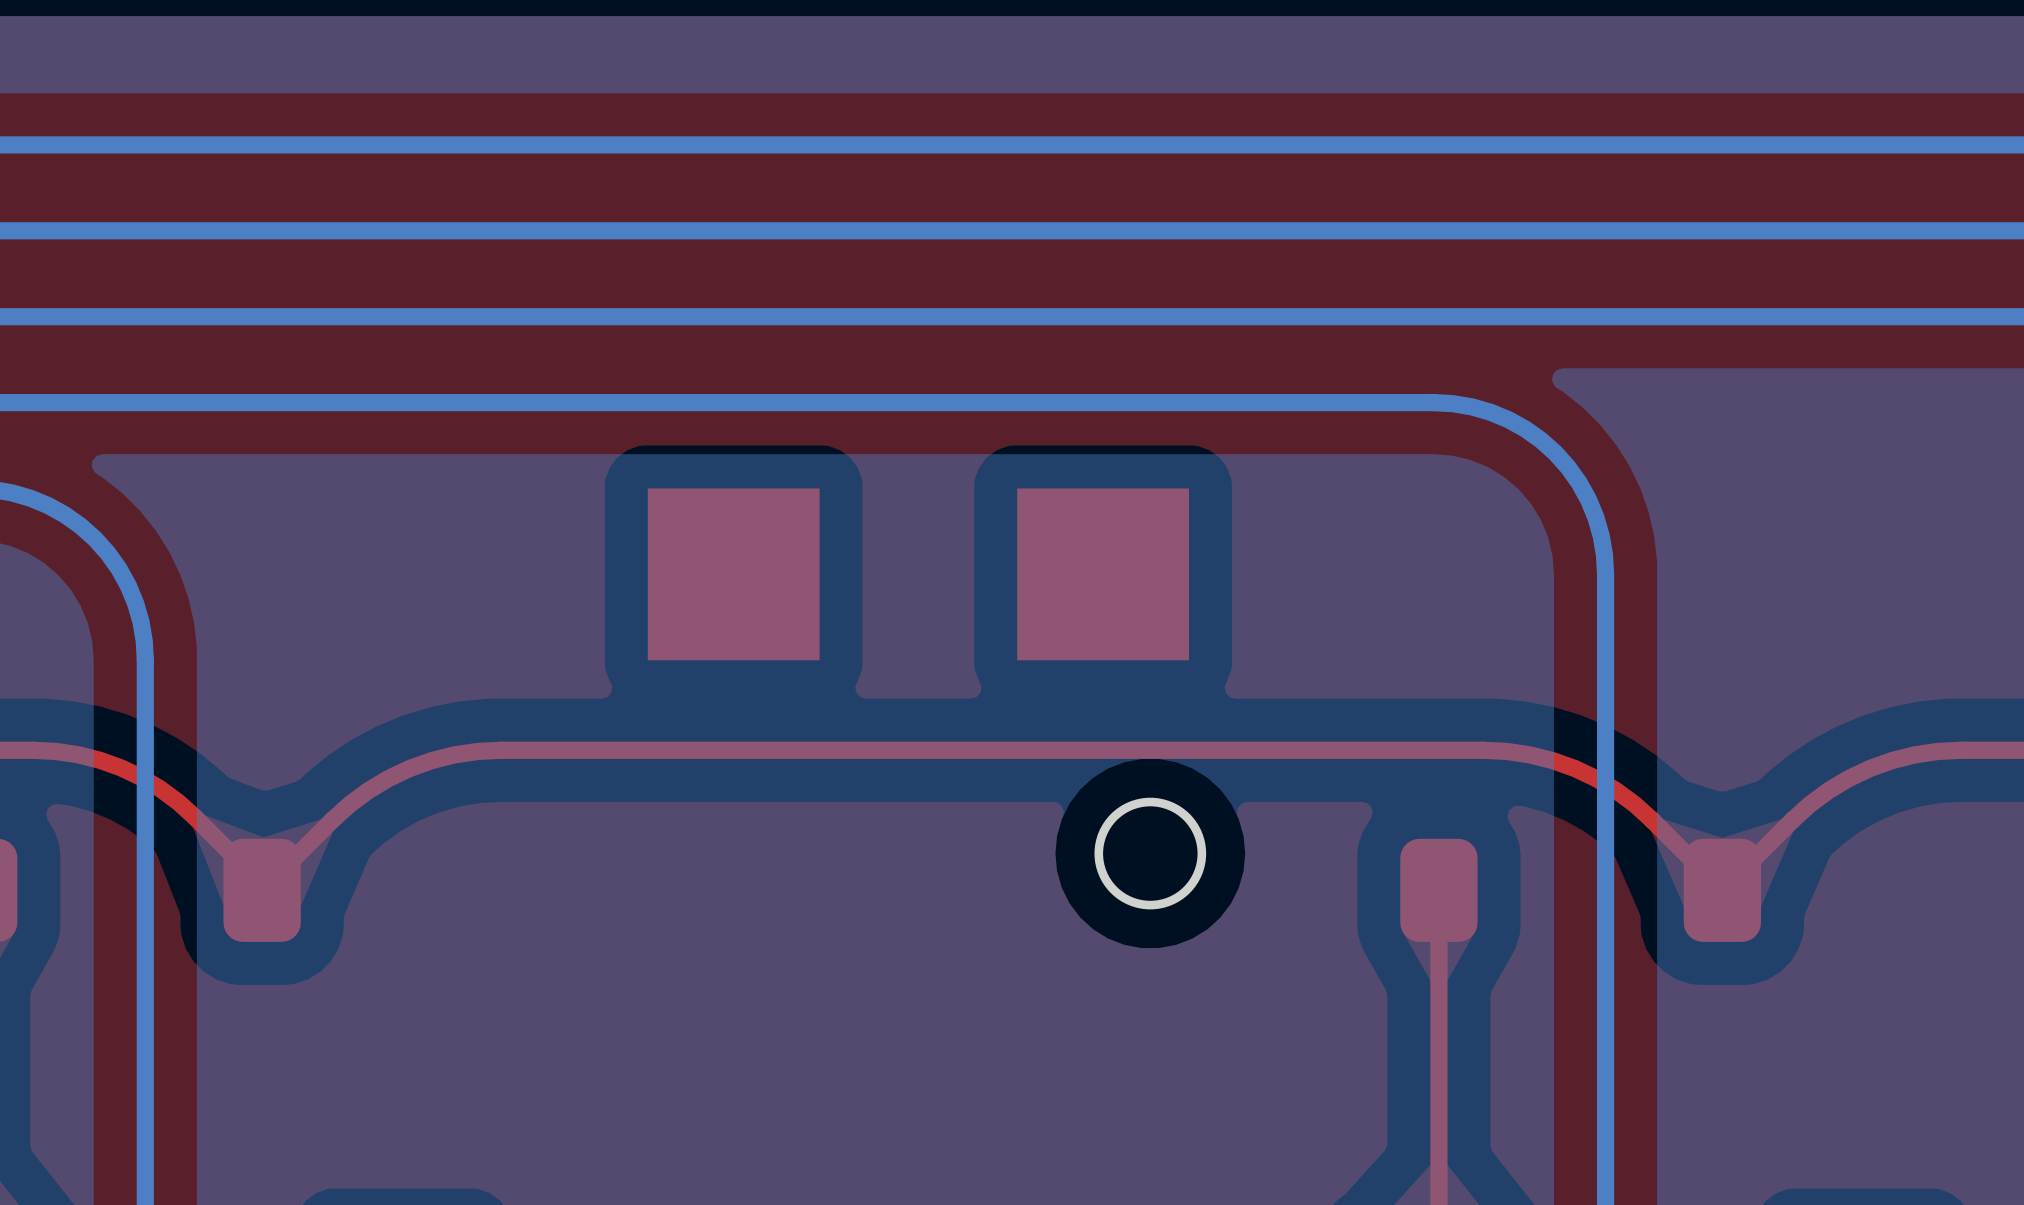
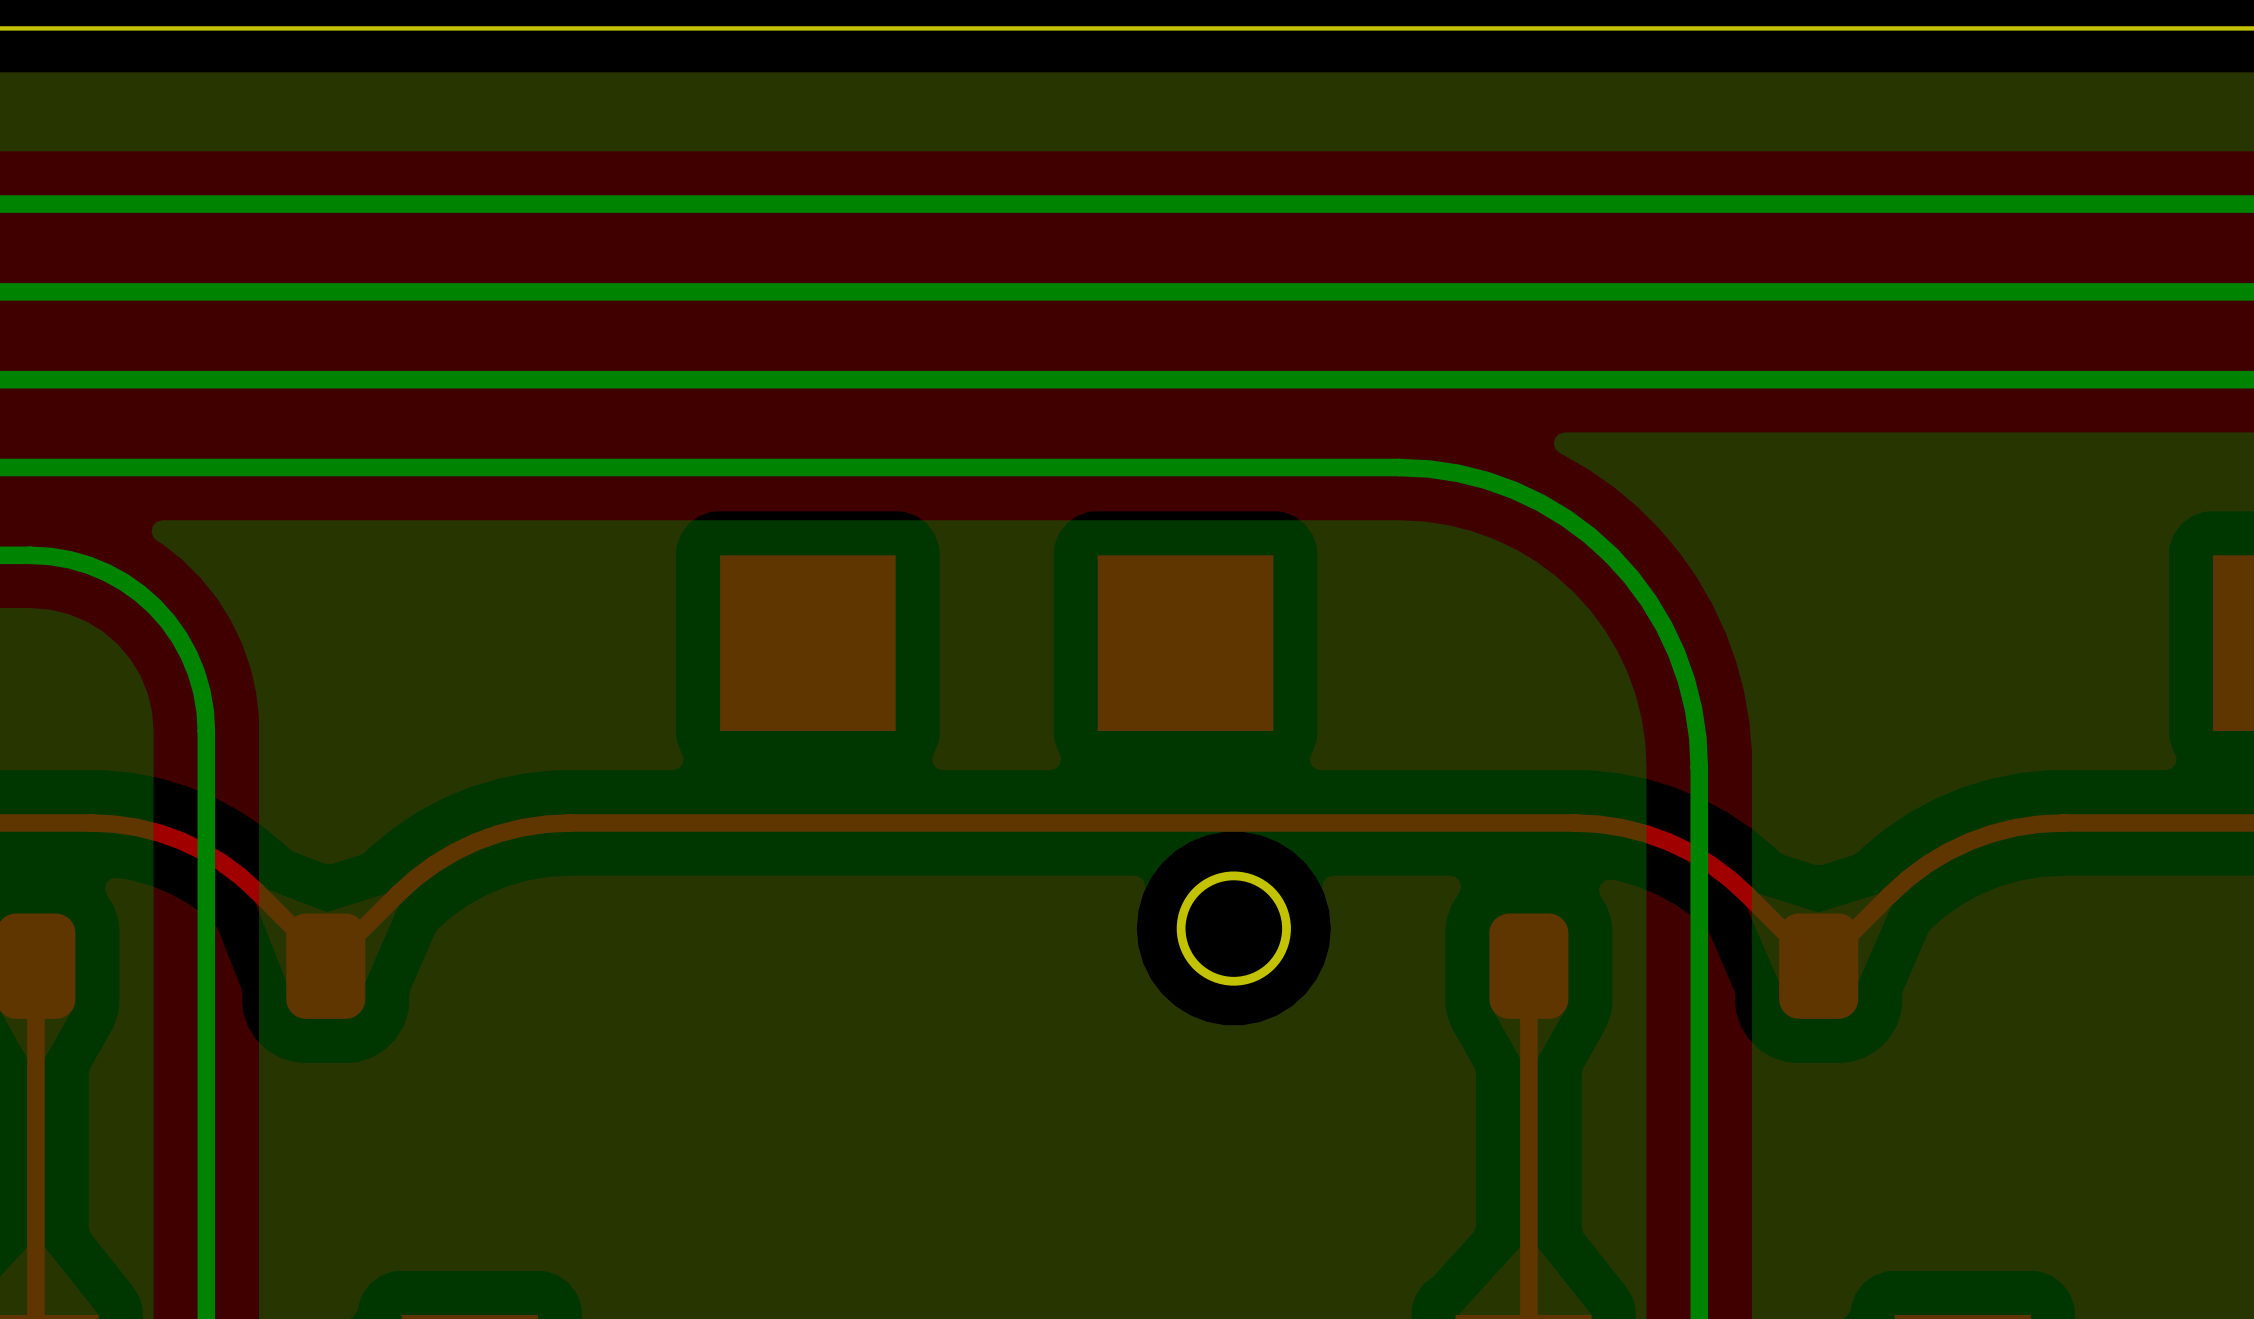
bottom track: (1312, 402) (1433, 402) (1472, 406) (1508, 419) (1540, 440) (1555, 452) (1568, 467) (1588, 499) (1601, 536) (1605, 574) (1605, 695) -> (1399, 467) (1457, 473) (1514, 490) (1566, 518) (1611, 555) (1648, 600) (1676, 652) (1693, 708) (1699, 767)

